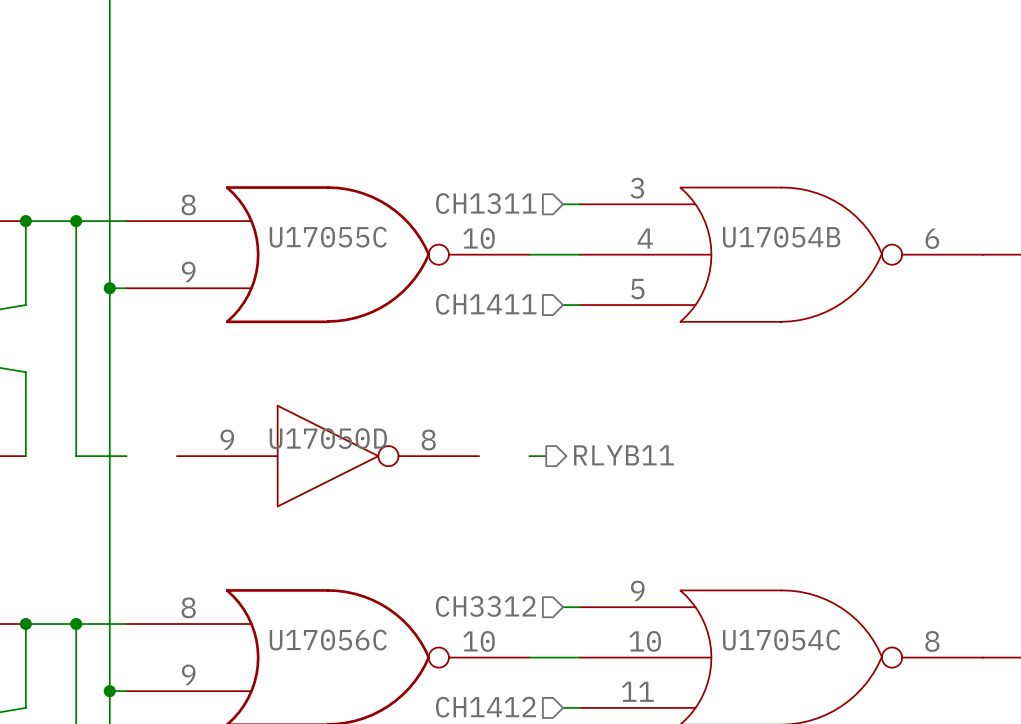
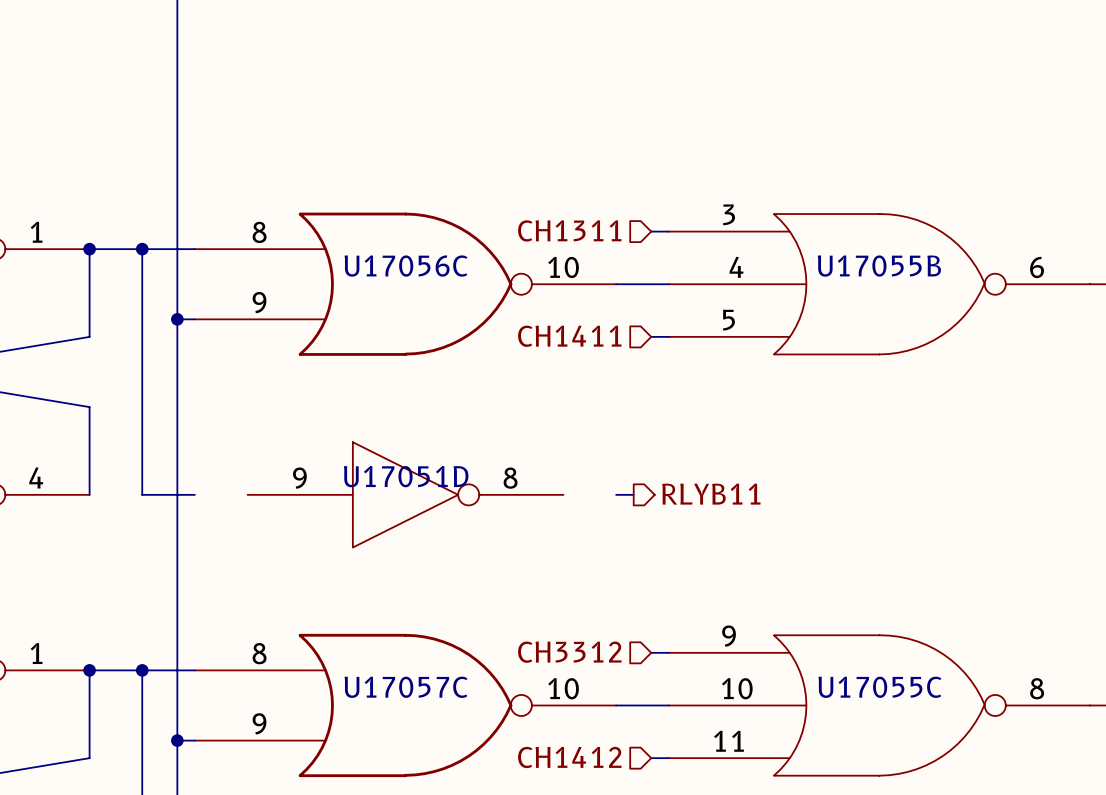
U17055C name: U17055C (328, 237) -> U17056C (406, 266)
U17054B name: U17054B (781, 237) -> U17055B (879, 266)
U17050D name: U17050D (328, 438) -> U17051D (406, 476)
U17056C name: U17056C (328, 640) -> U17057C (406, 687)
U17054C name: U17054C (781, 640) -> U17055C (879, 687)

